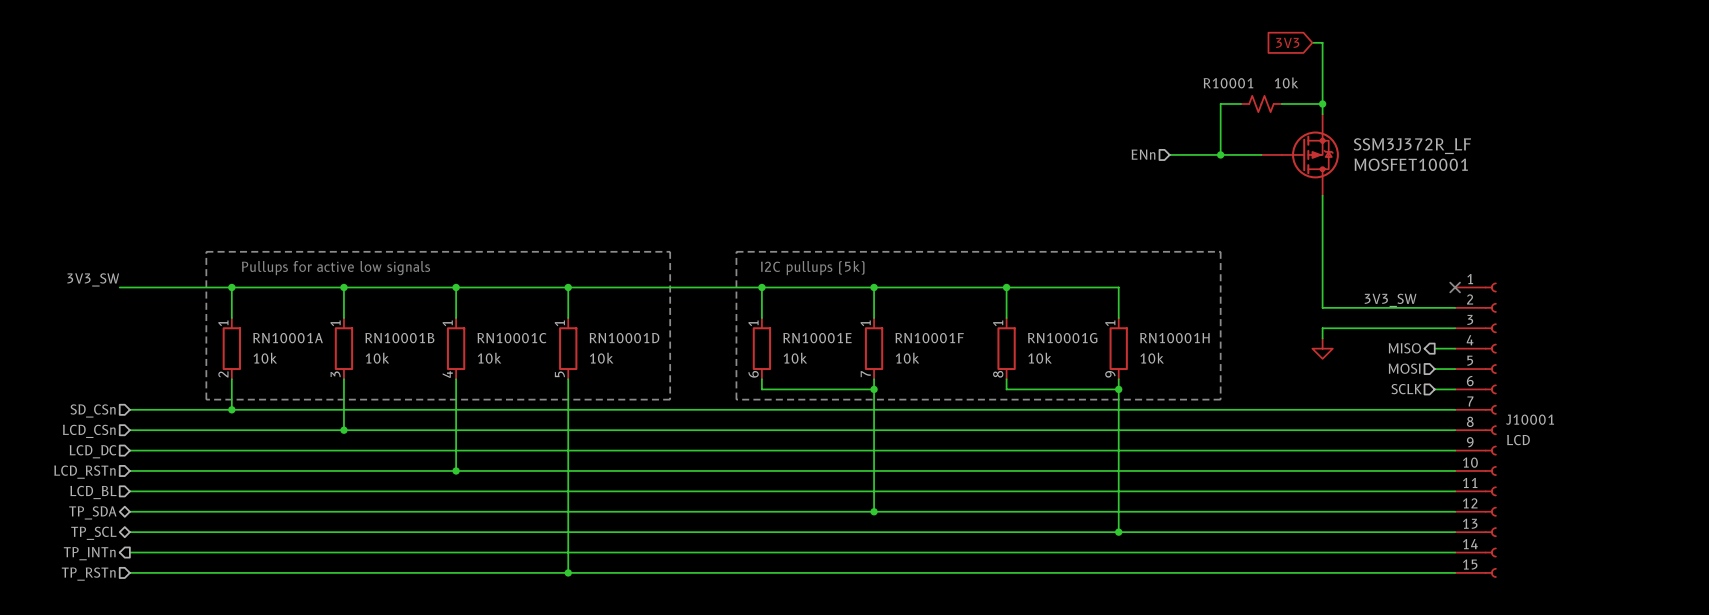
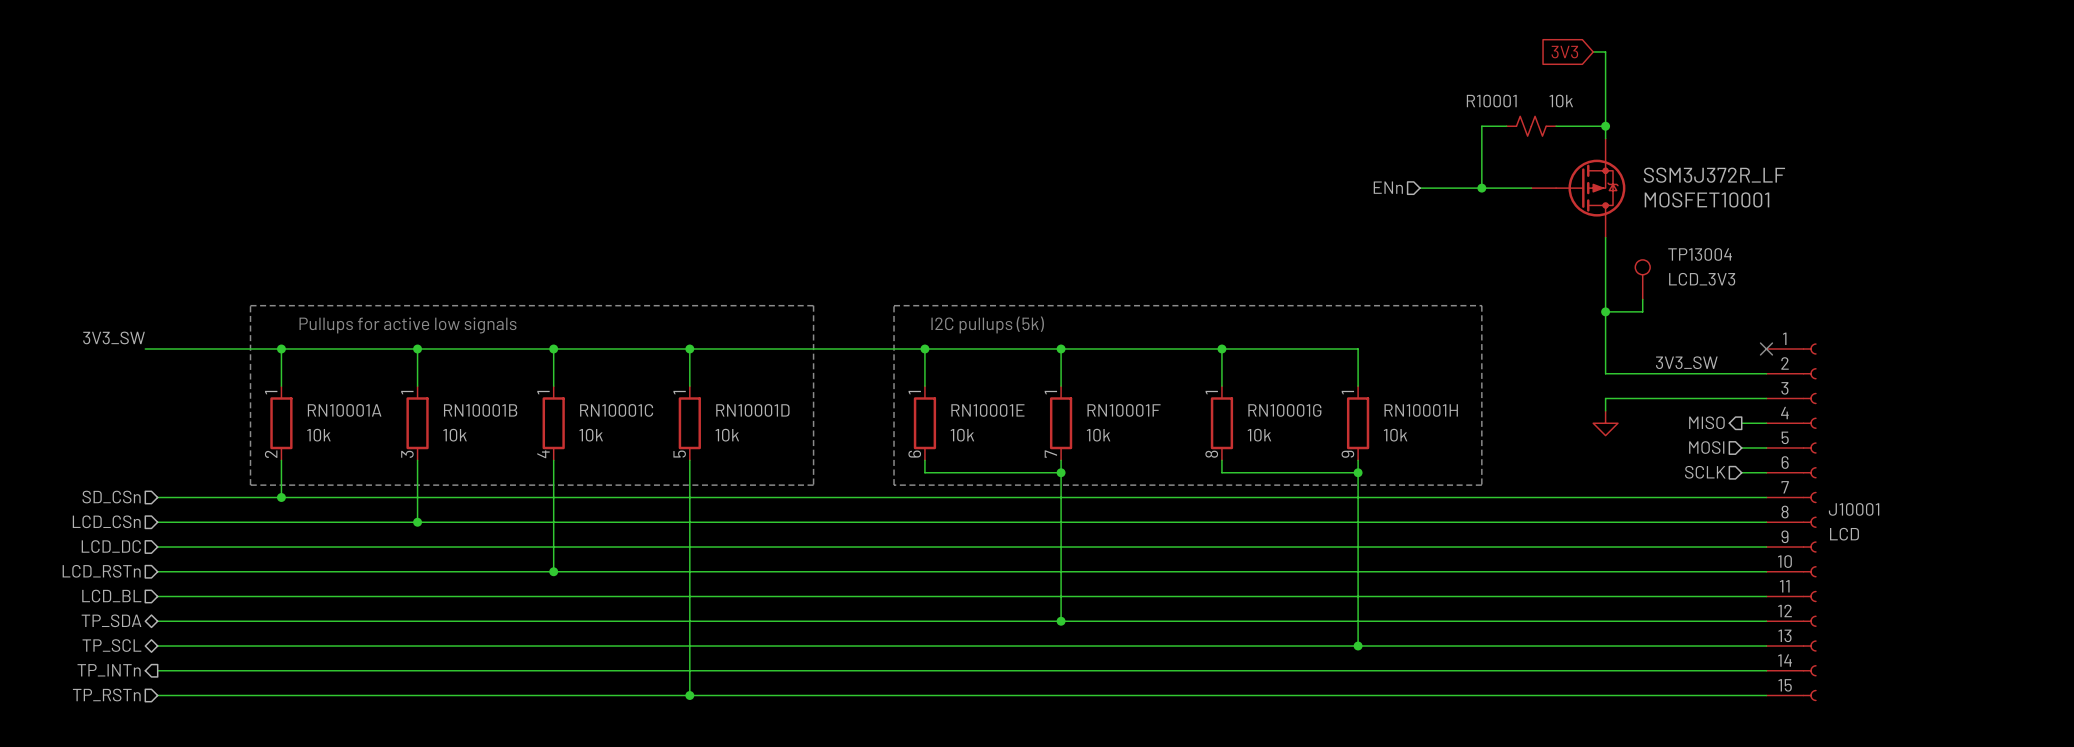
TP13004: none -> LCD_3V3 (1642, 279)
wire: none -> (1642, 299) (1642, 311) (1605, 311)
junction: none -> (1605, 311)

